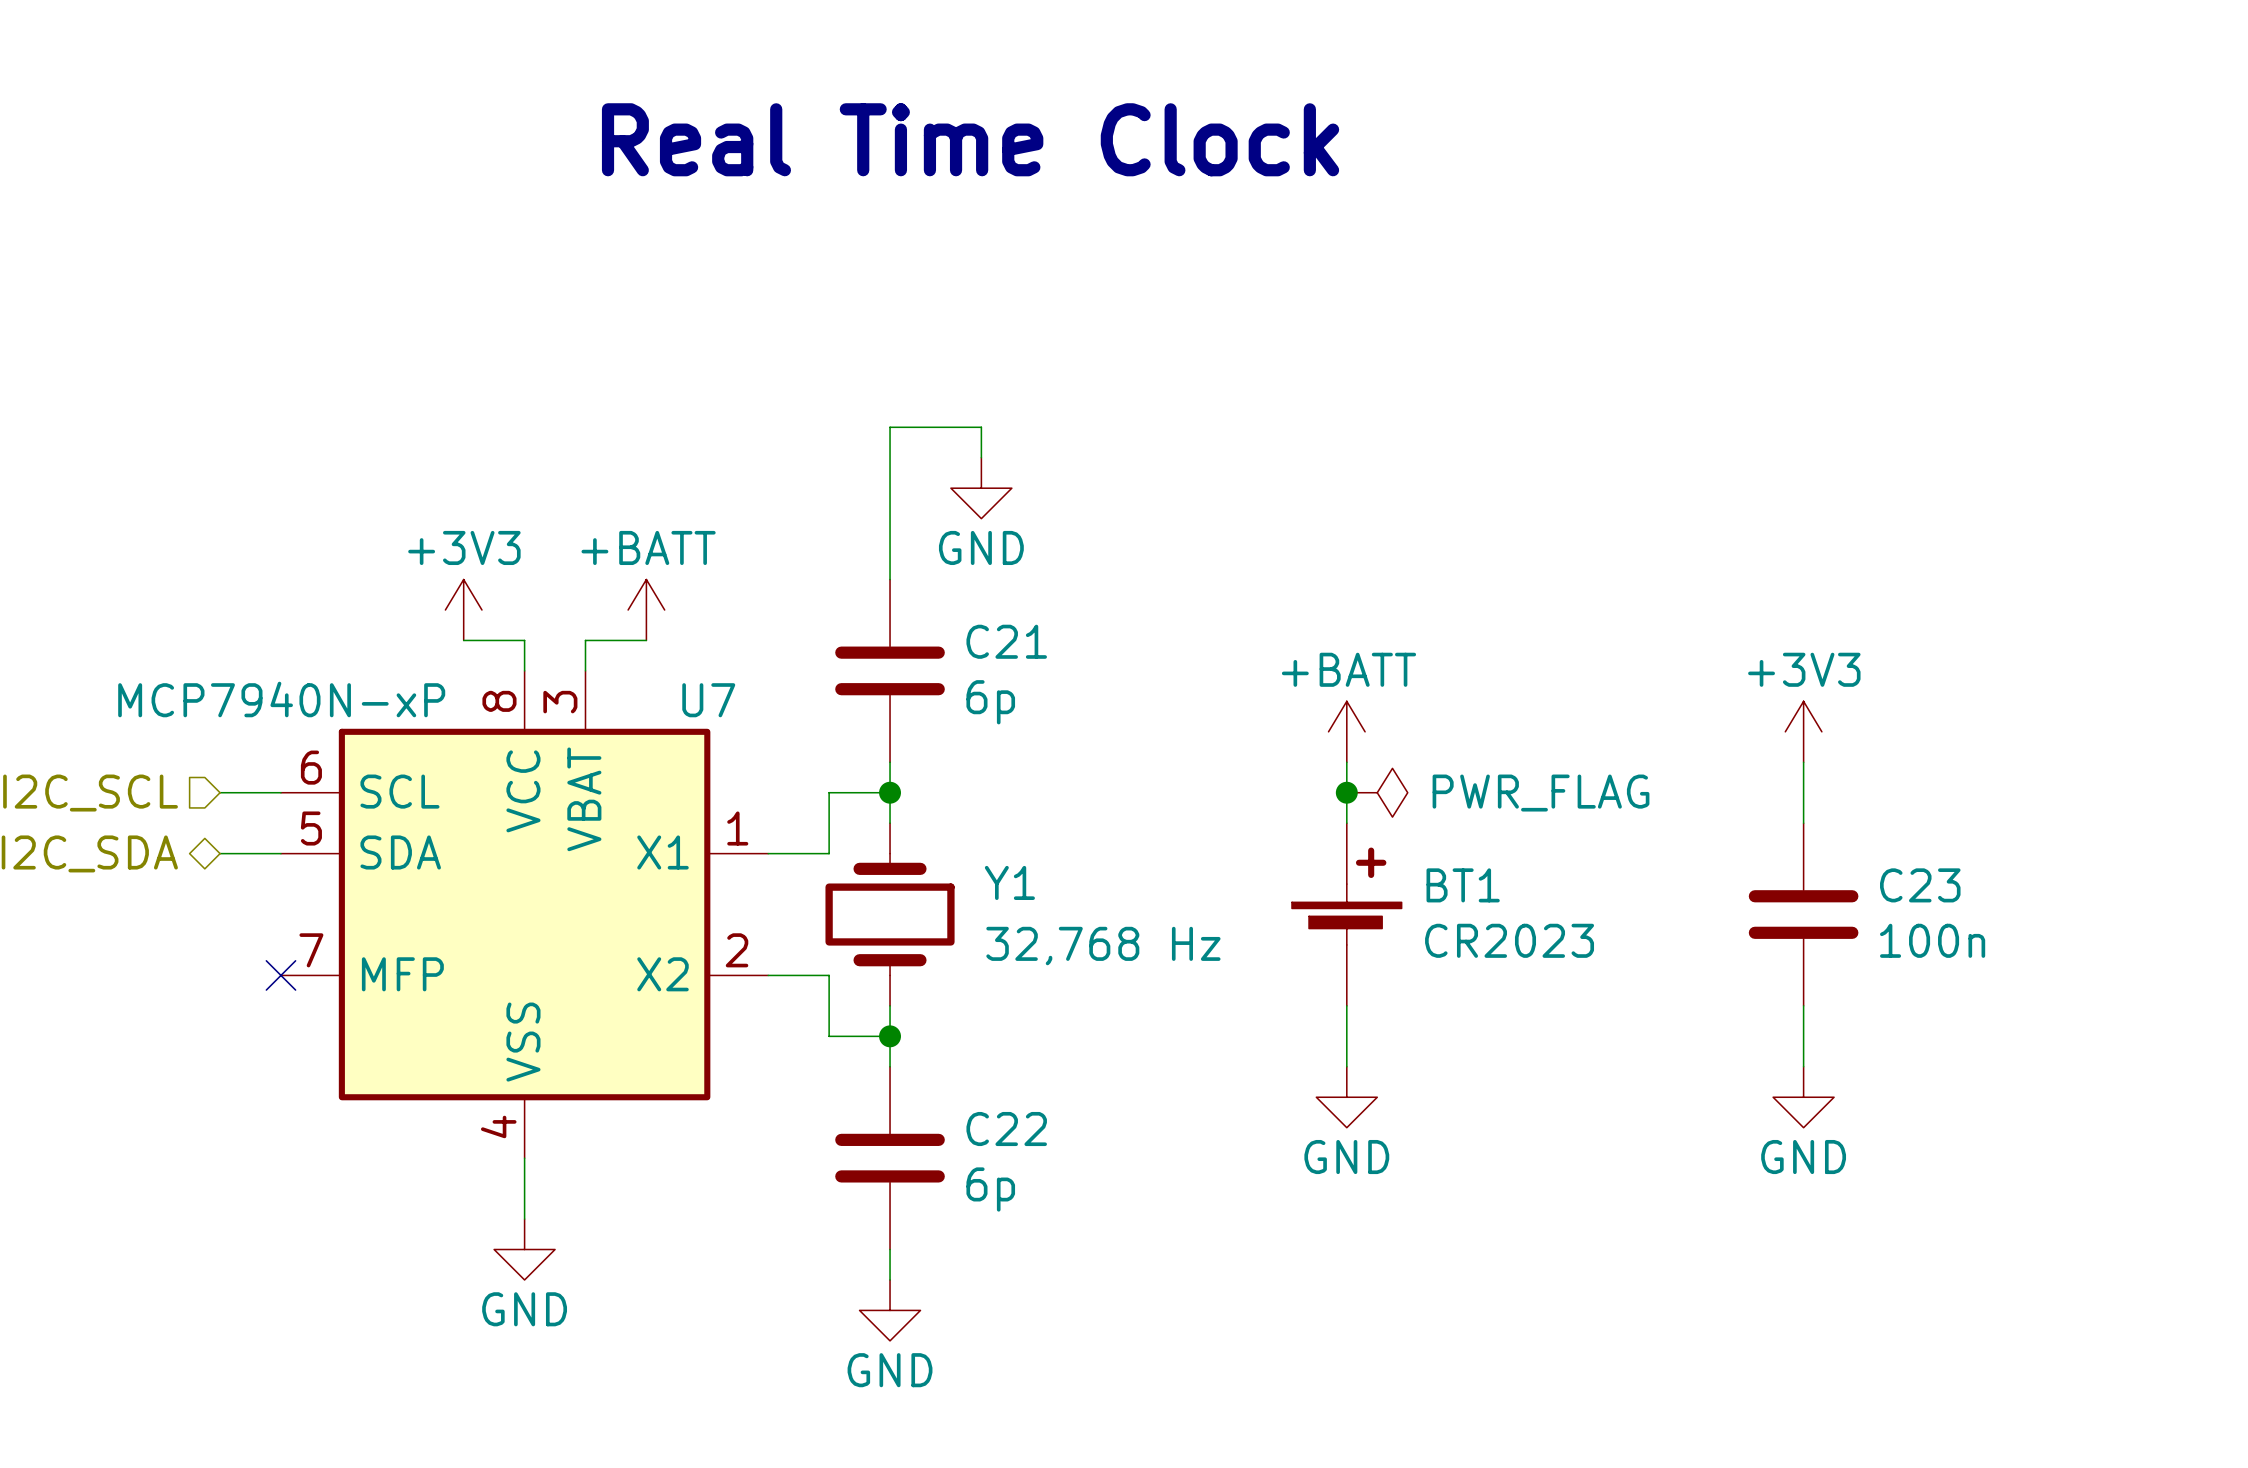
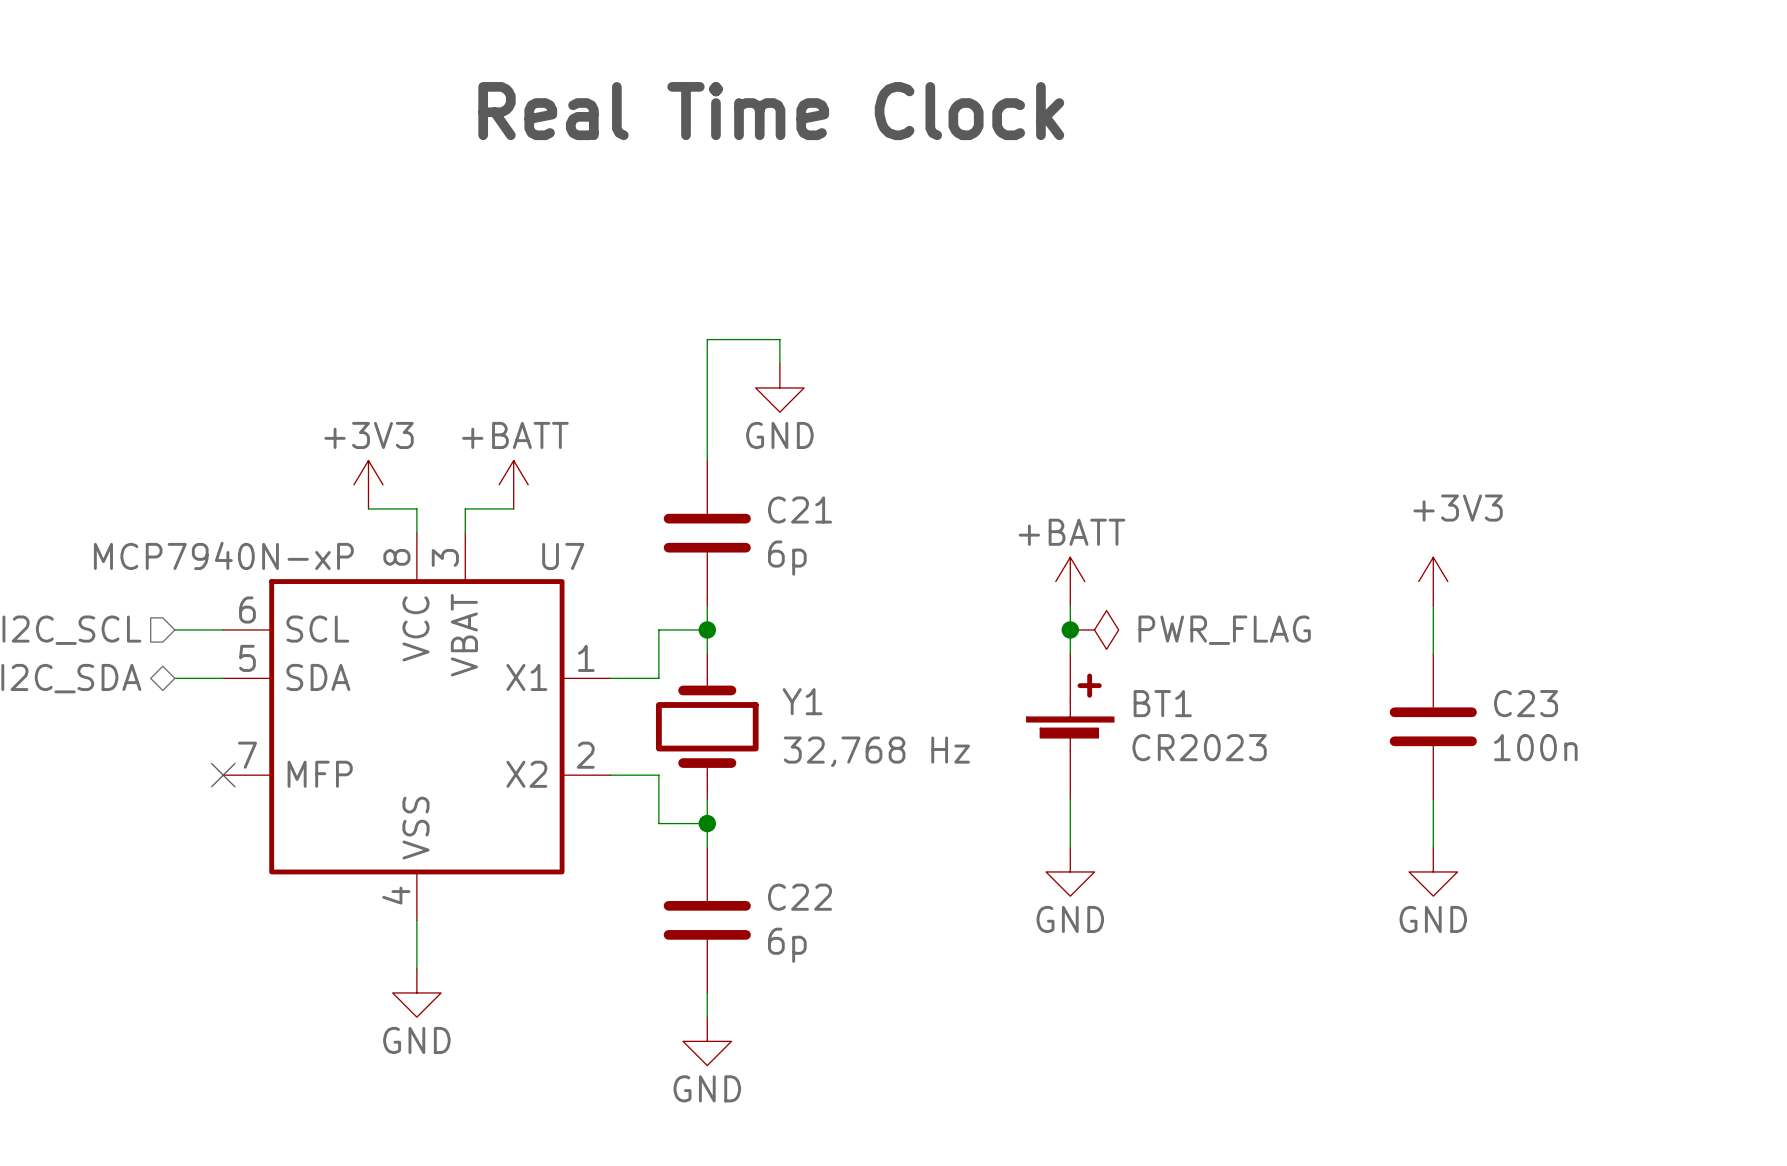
power symbol text position: +3V3 (1804, 669) -> +3V3 (1458, 508)

